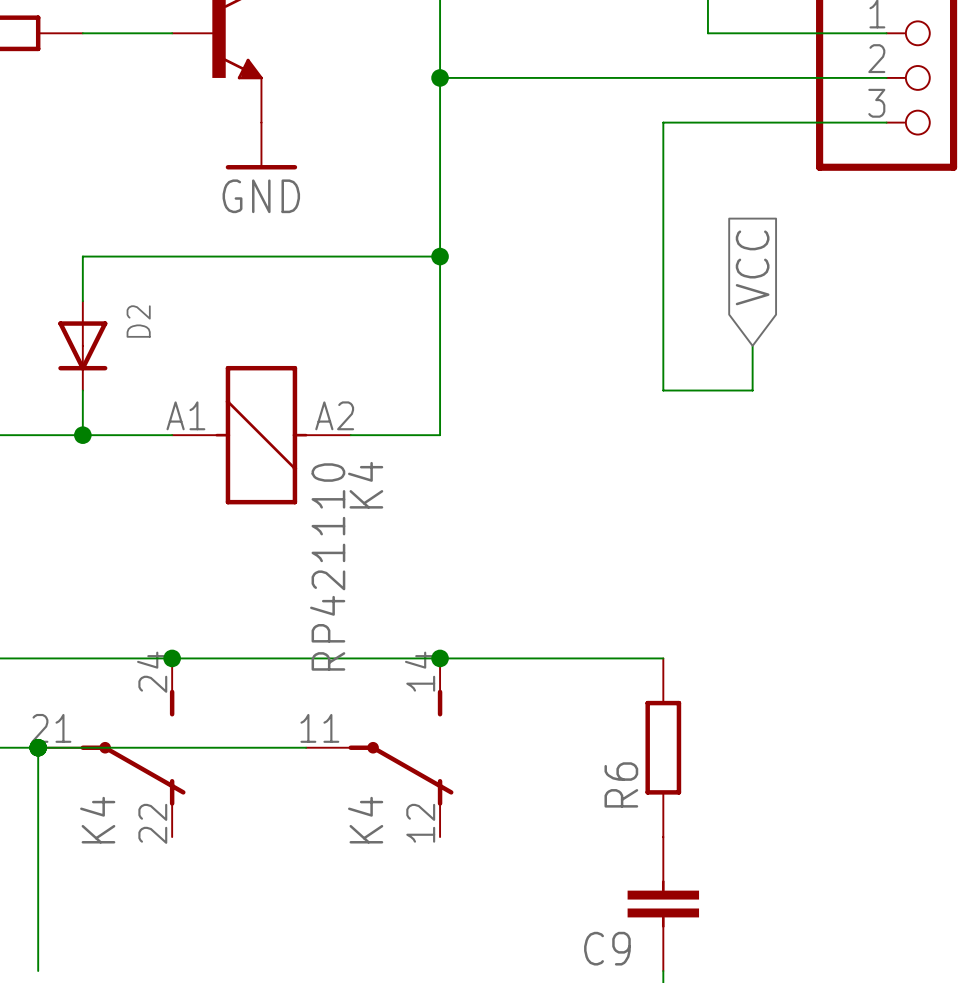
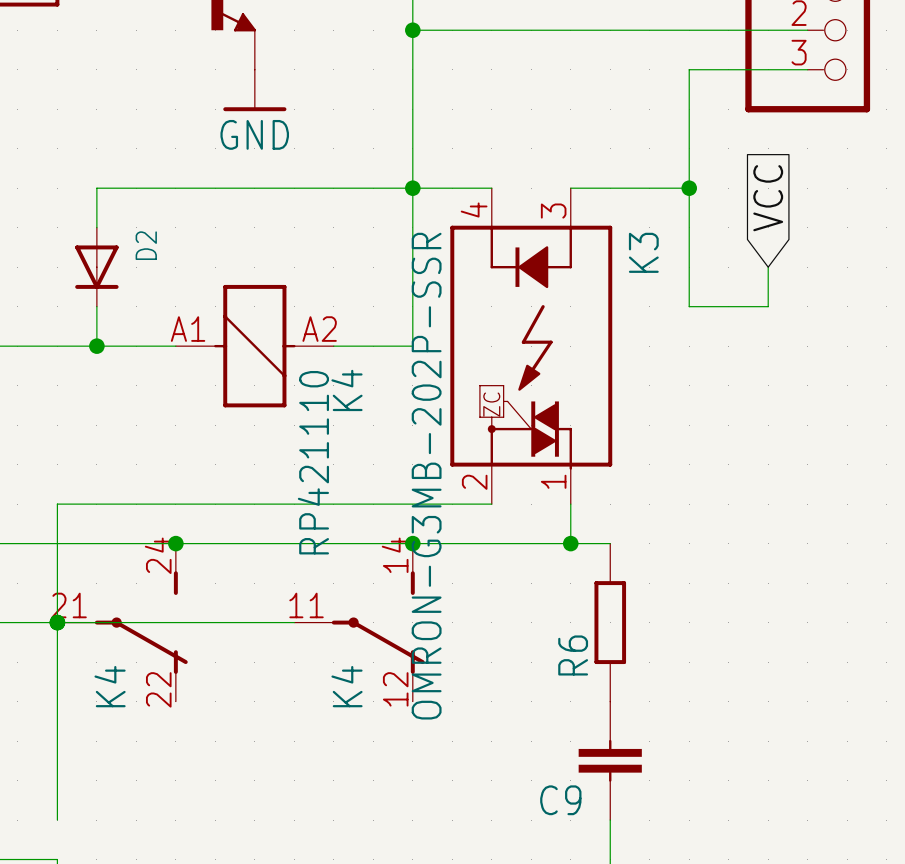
wire: (752, 122) (663, 122) (663, 390) (752, 390) -> (689, 69) (689, 267)
wire: none -> (412, 188) (491, 188)
wire: none -> (570, 188) (689, 188)
junction: none -> (689, 188)
global label position: VCC (752, 267) -> VCC (768, 198)
wire: none -> (768, 267) (768, 306) (689, 306)
K3: none -> OMRON-G3MB-202P-SSR (531, 346)
wire: none -> (491, 504) (57, 504) (57, 622)
wire: none -> (570, 504) (570, 543)
junction: none -> (570, 543)

